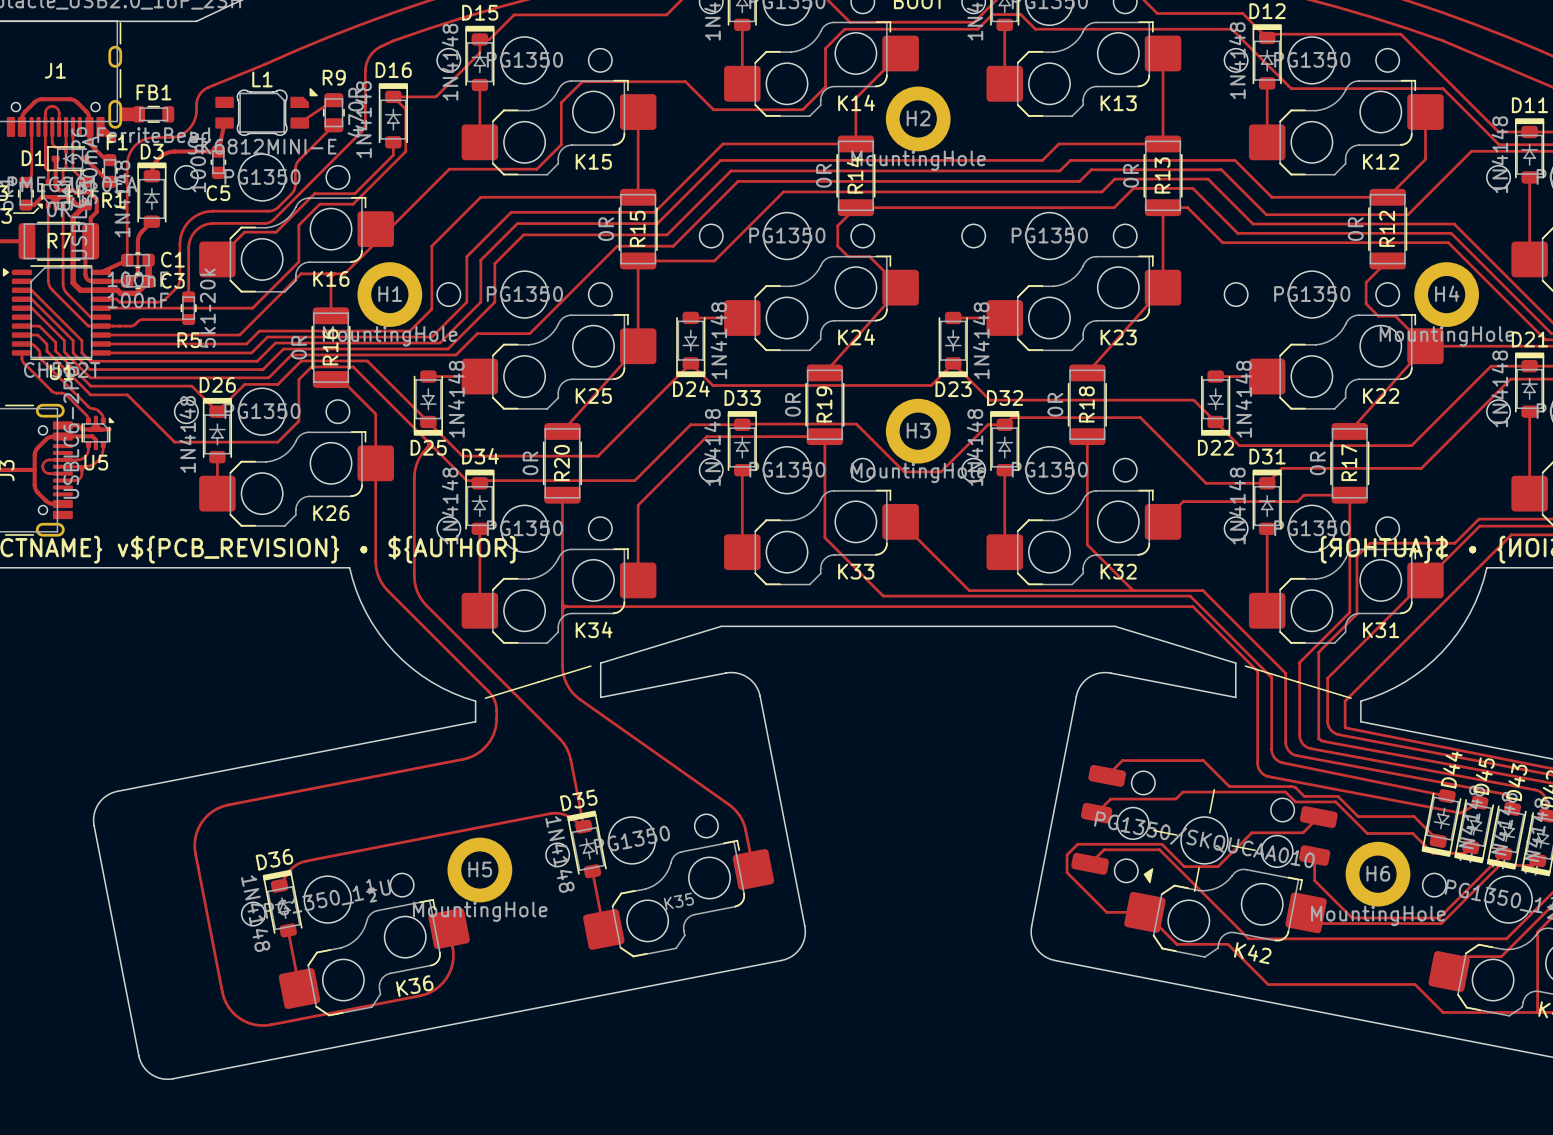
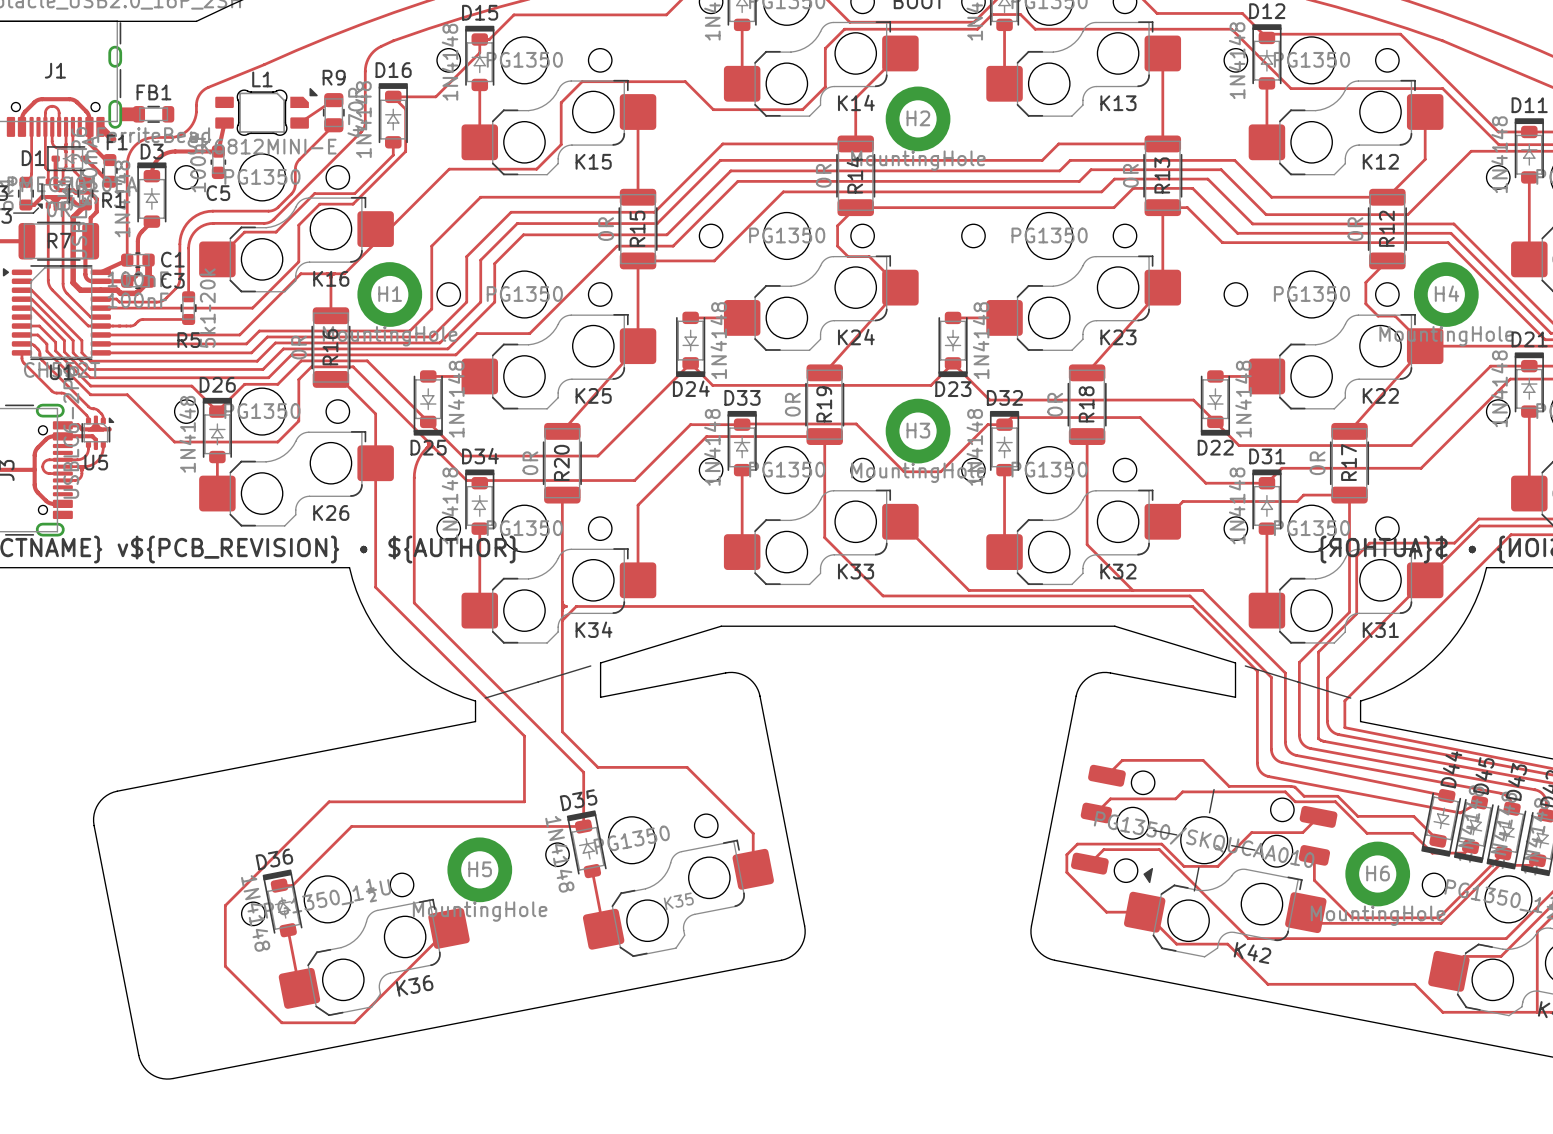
track: (375, 561) (378, 577) (385, 587) (492, 695) (496, 708) (494, 732) (484, 748) (467, 758) (228, 804) (208, 814) (196, 832) (194, 848) (223, 997) (231, 1011) (239, 1018) (254, 1024) (265, 1025) (425, 994) (439, 986) (451, 968) (453, 952) (449, 928) -> (375, 561) (375, 587) (524, 736) (524, 801) (329, 801) (225, 905) (225, 966) (281, 1022) (354, 1022) (449, 928)
track: (414, 576) (416, 588) (423, 602) (564, 744) (570, 759) (583, 826) (564, 814) (550, 813) (303, 861) (291, 868) (279, 885) -> (414, 576) (414, 602) (583, 772) (583, 826) (351, 826) (292, 885) (279, 885)
track: (562, 606) (576, 606) -> (562, 620) (576, 606)
track: (562, 665) (567, 684) (576, 696) (736, 811) (744, 825) (753, 869) -> (562, 665) (562, 731) (597, 767) (687, 767) (753, 833) (753, 869)

